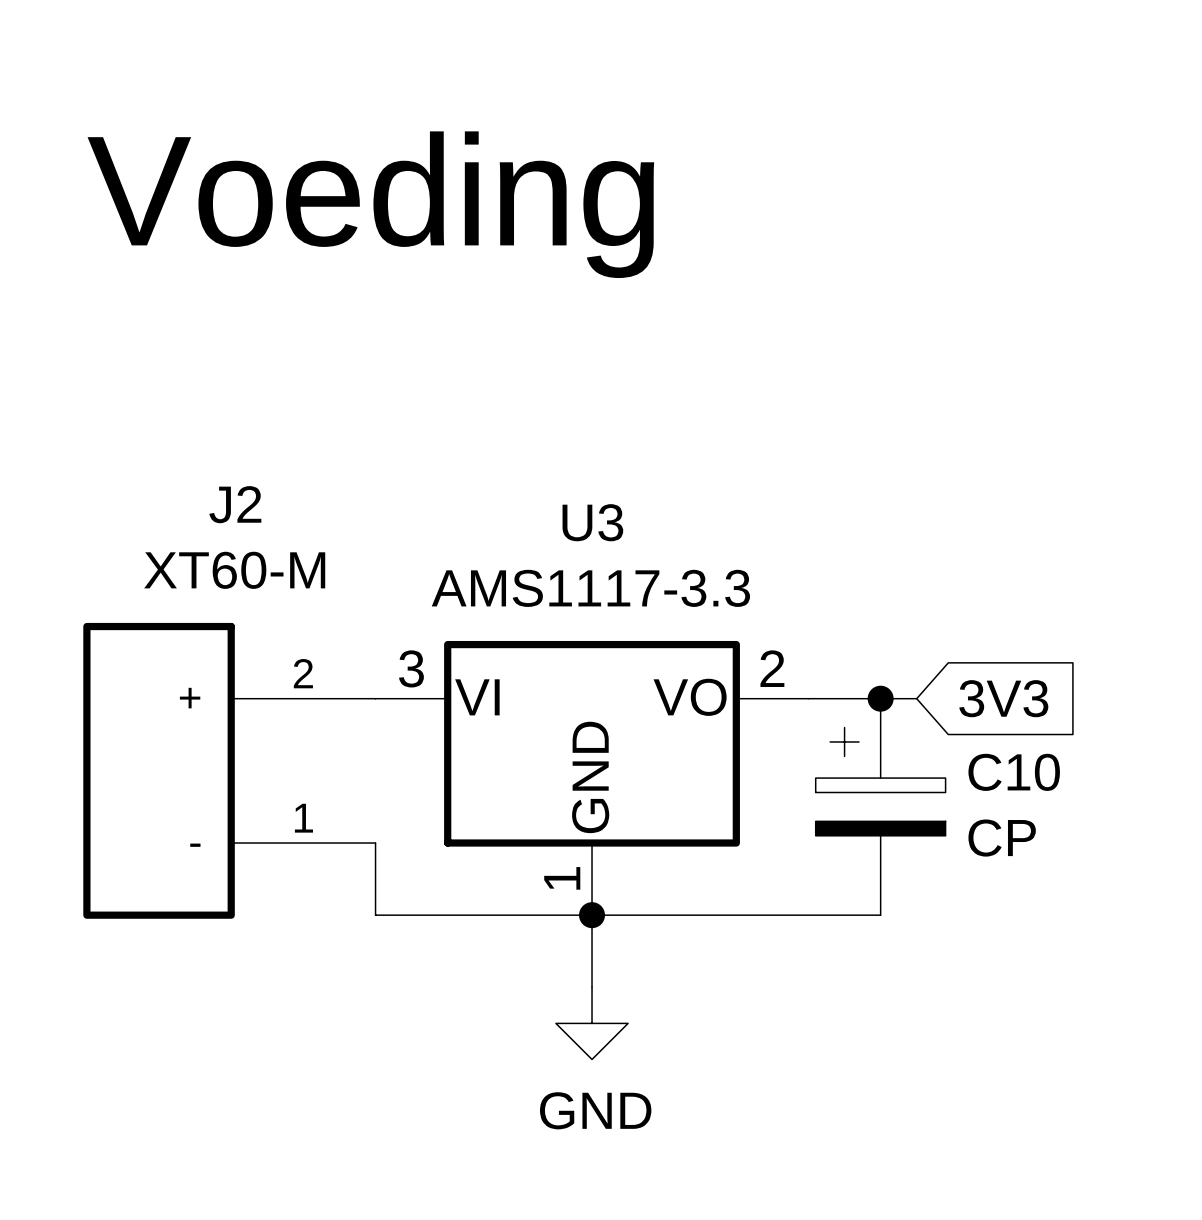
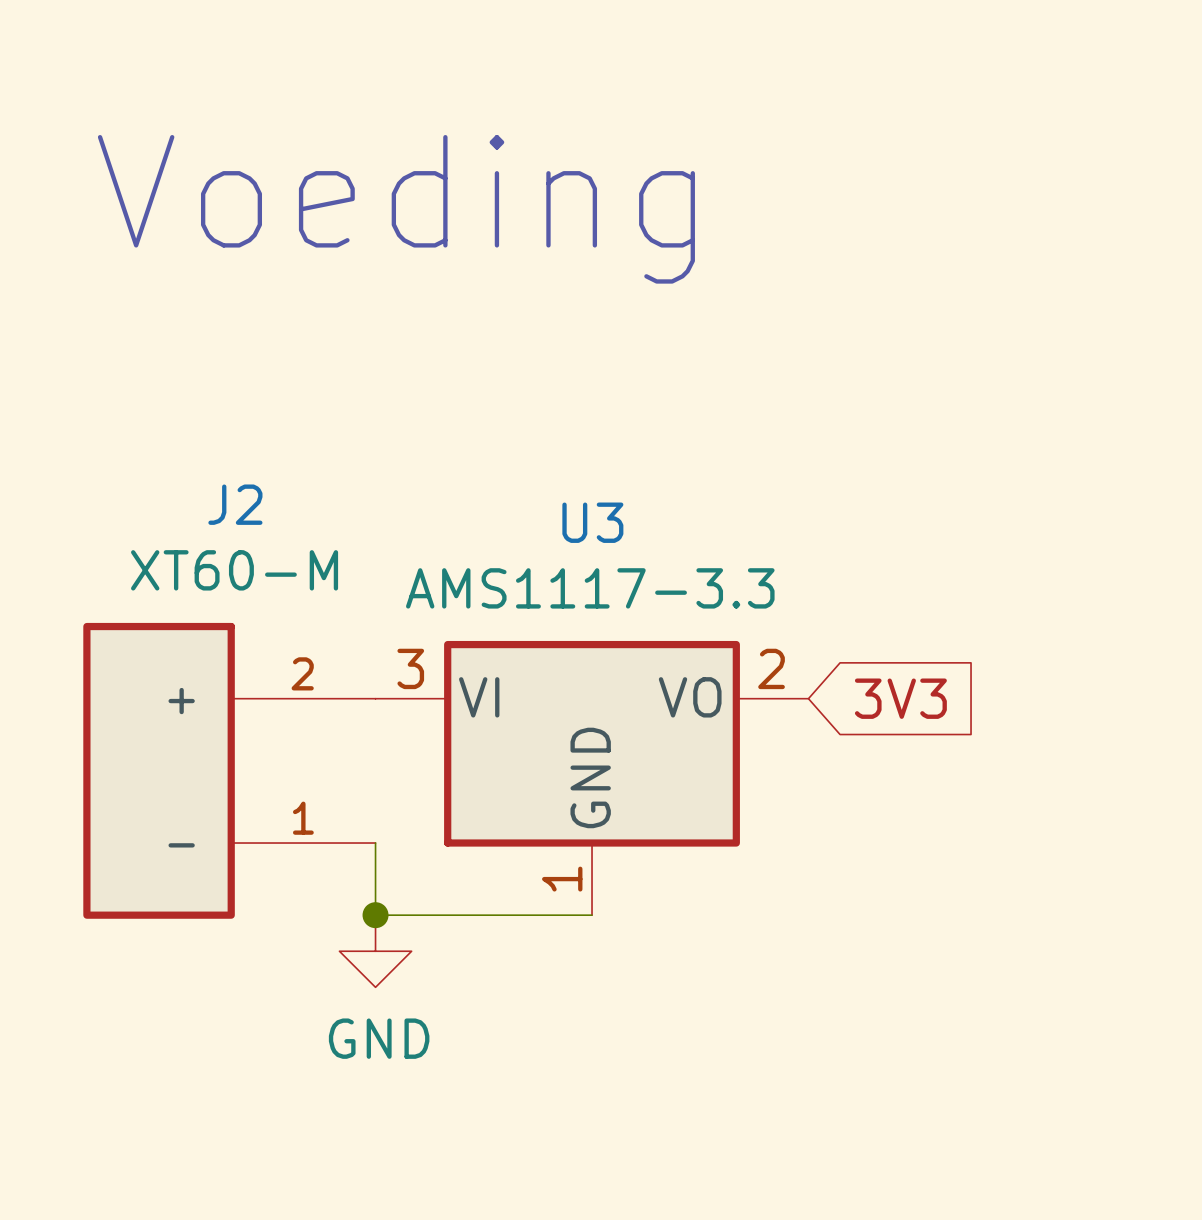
wire: (808, 698) (916, 698) -> none
junction: (880, 698) -> none
global label position: 3V3 (1003, 698) -> 3V3 (900, 698)
C10: CP (880, 806) -> none
junction: none -> (375, 915)
junction: (592, 915) -> none
wire: (880, 915) (592, 915) (592, 987) -> none
power symbol position: GND (592, 1023) -> GND (375, 951)

